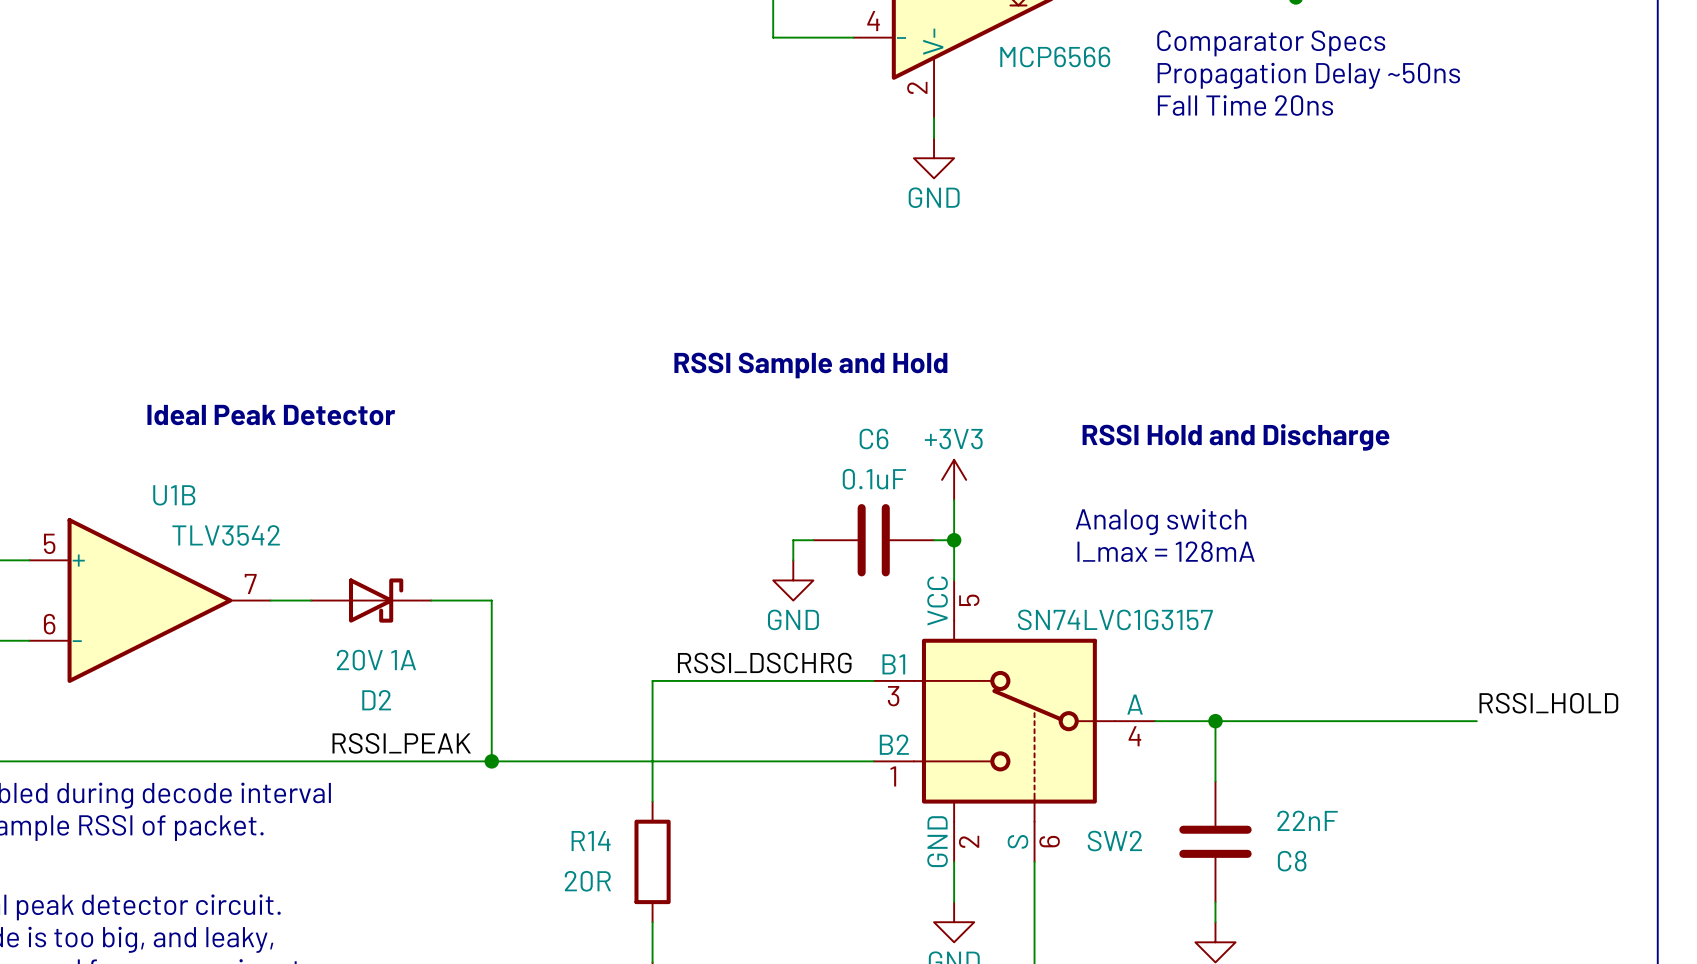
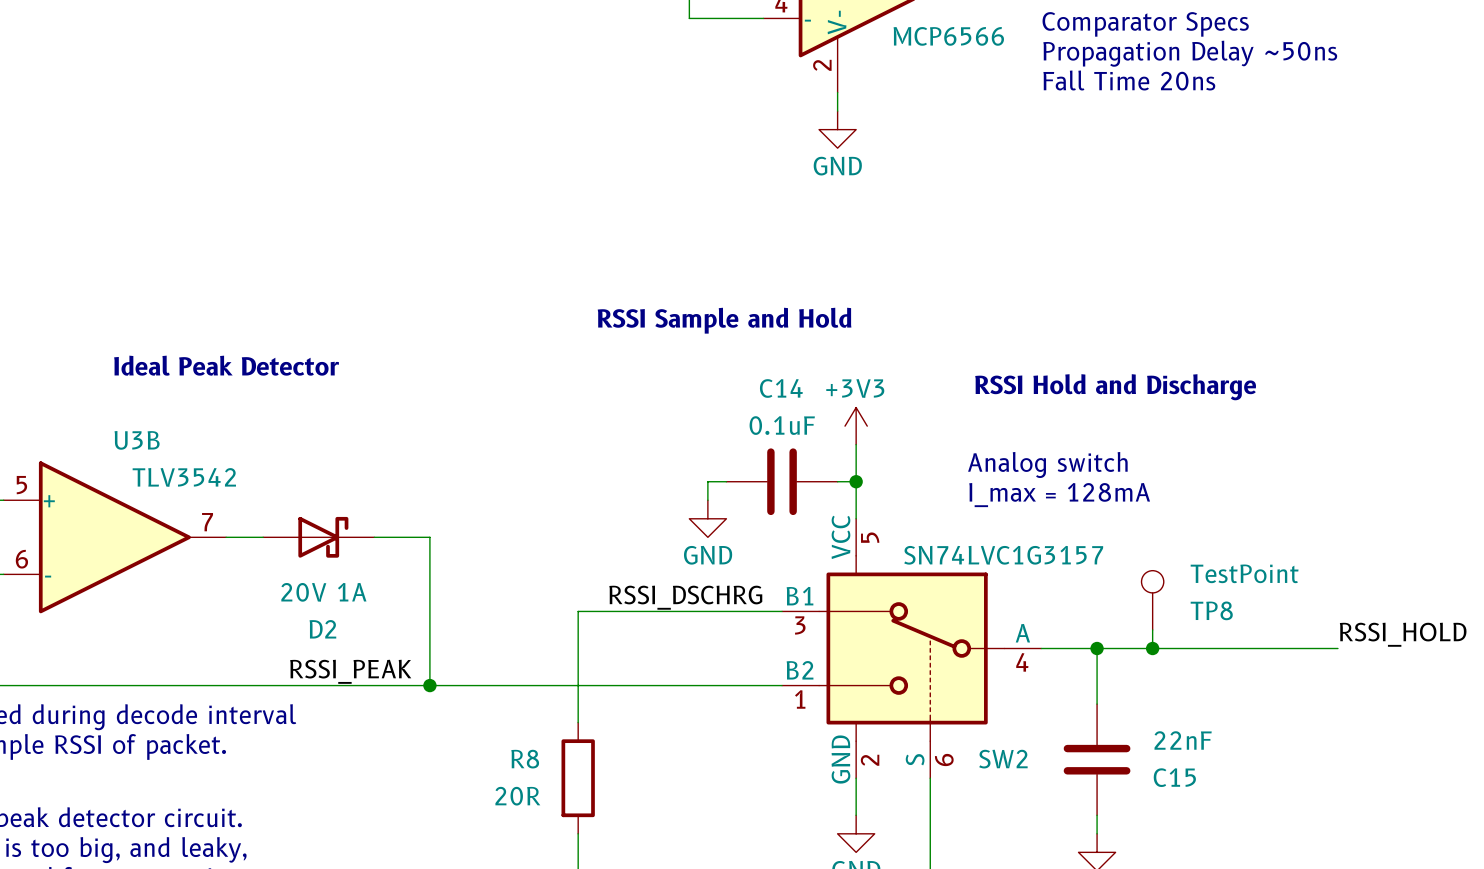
C6 name: C6 (874, 438) -> C14 (781, 388)
U1B name: U1B (174, 495) -> U3B (137, 440)
TP8: none -> TestPoint (1152, 600)
wire: none -> (1152, 629) (1152, 648)
junction: none -> (1152, 648)
R14 name: R14 (591, 841) -> R8 (525, 759)
C8 name: C8 (1292, 861) -> C15 (1174, 777)

